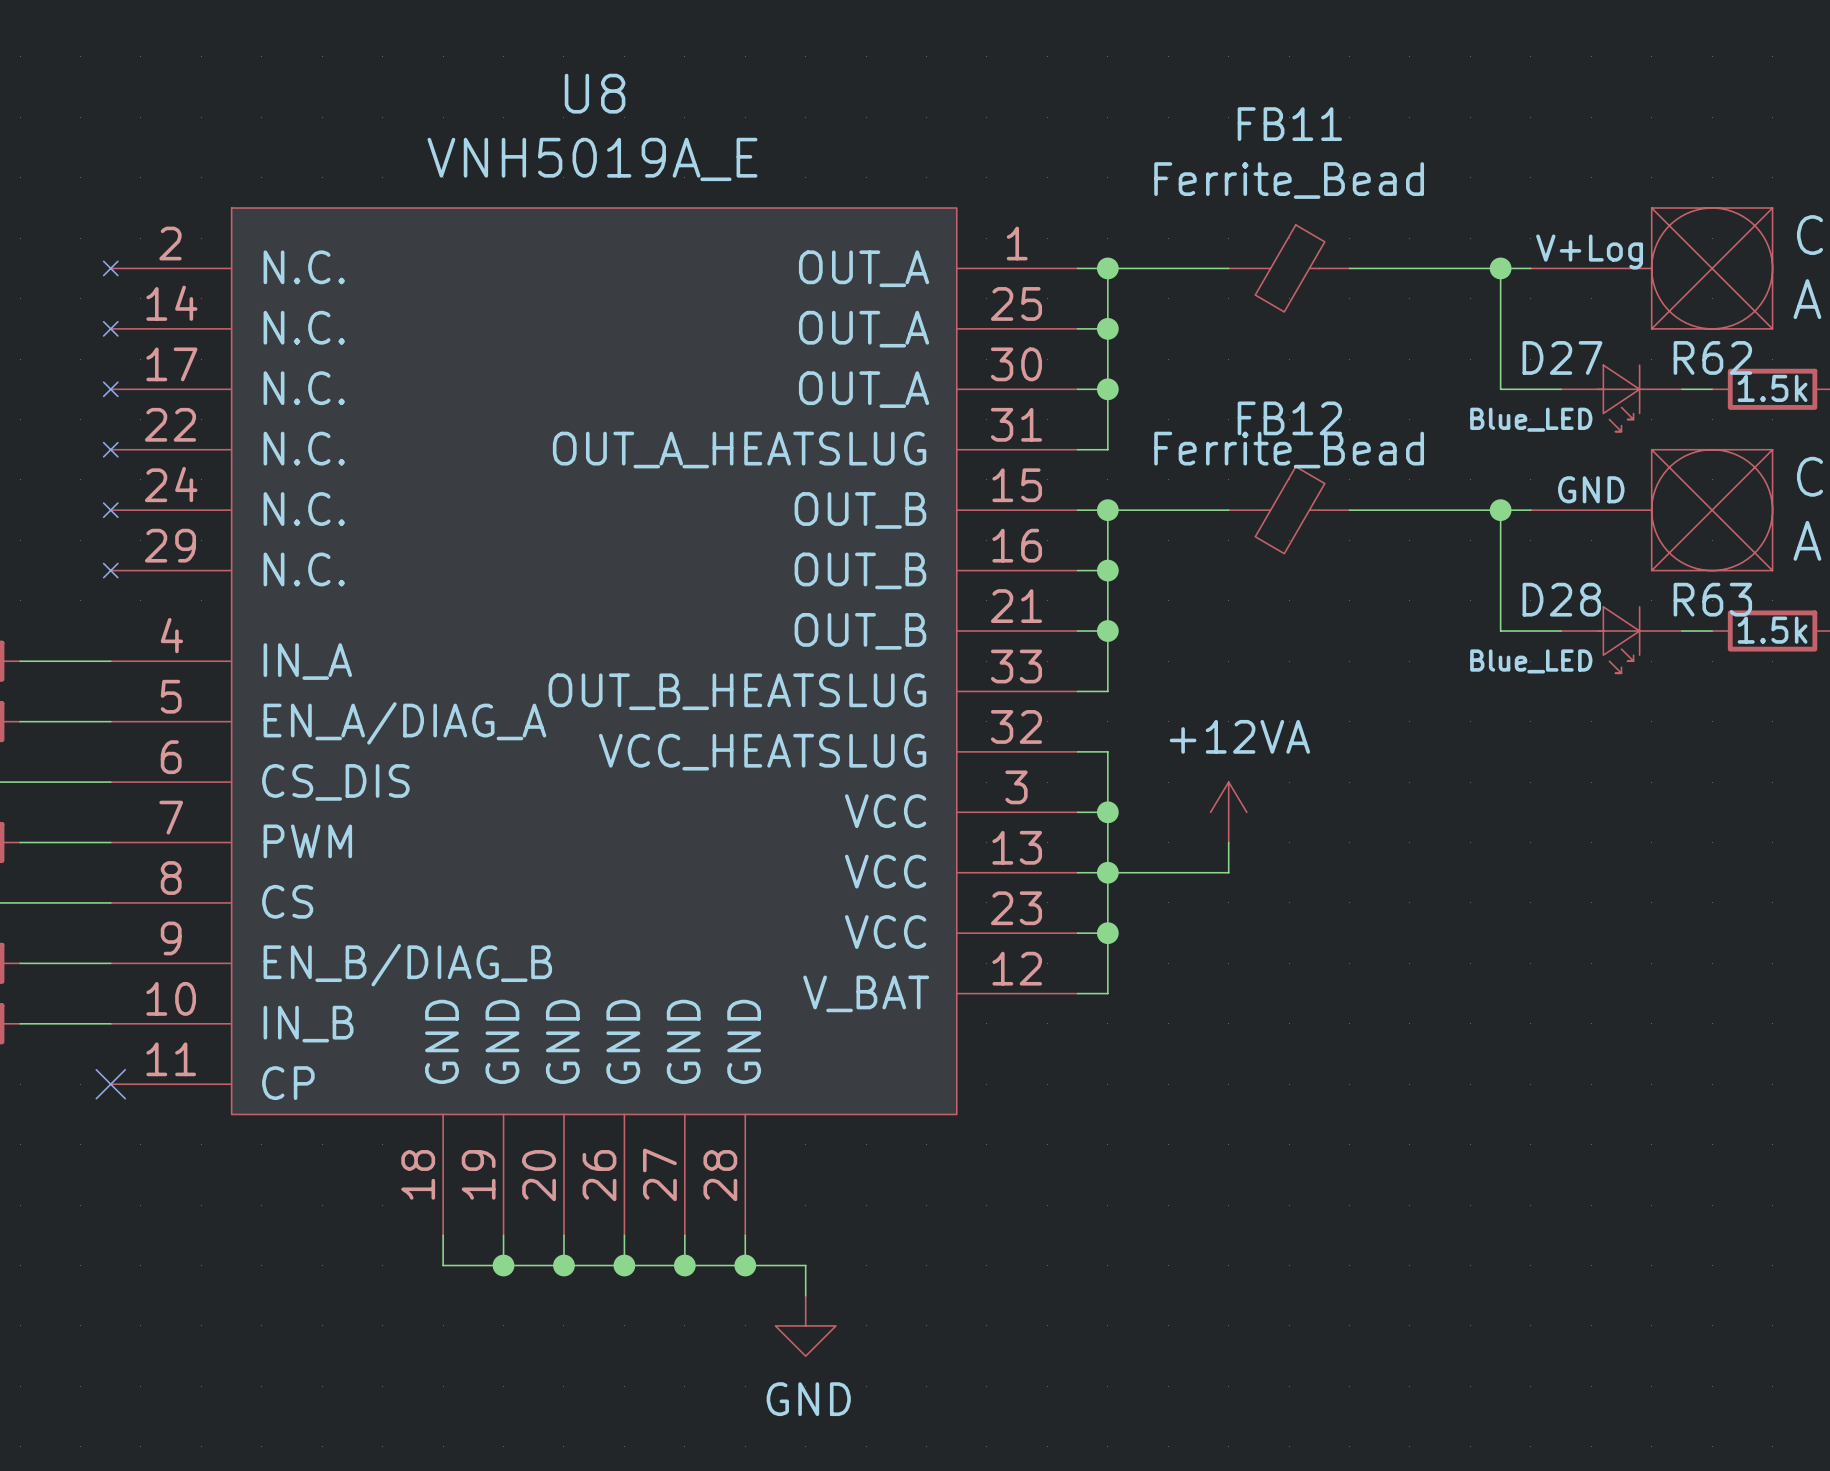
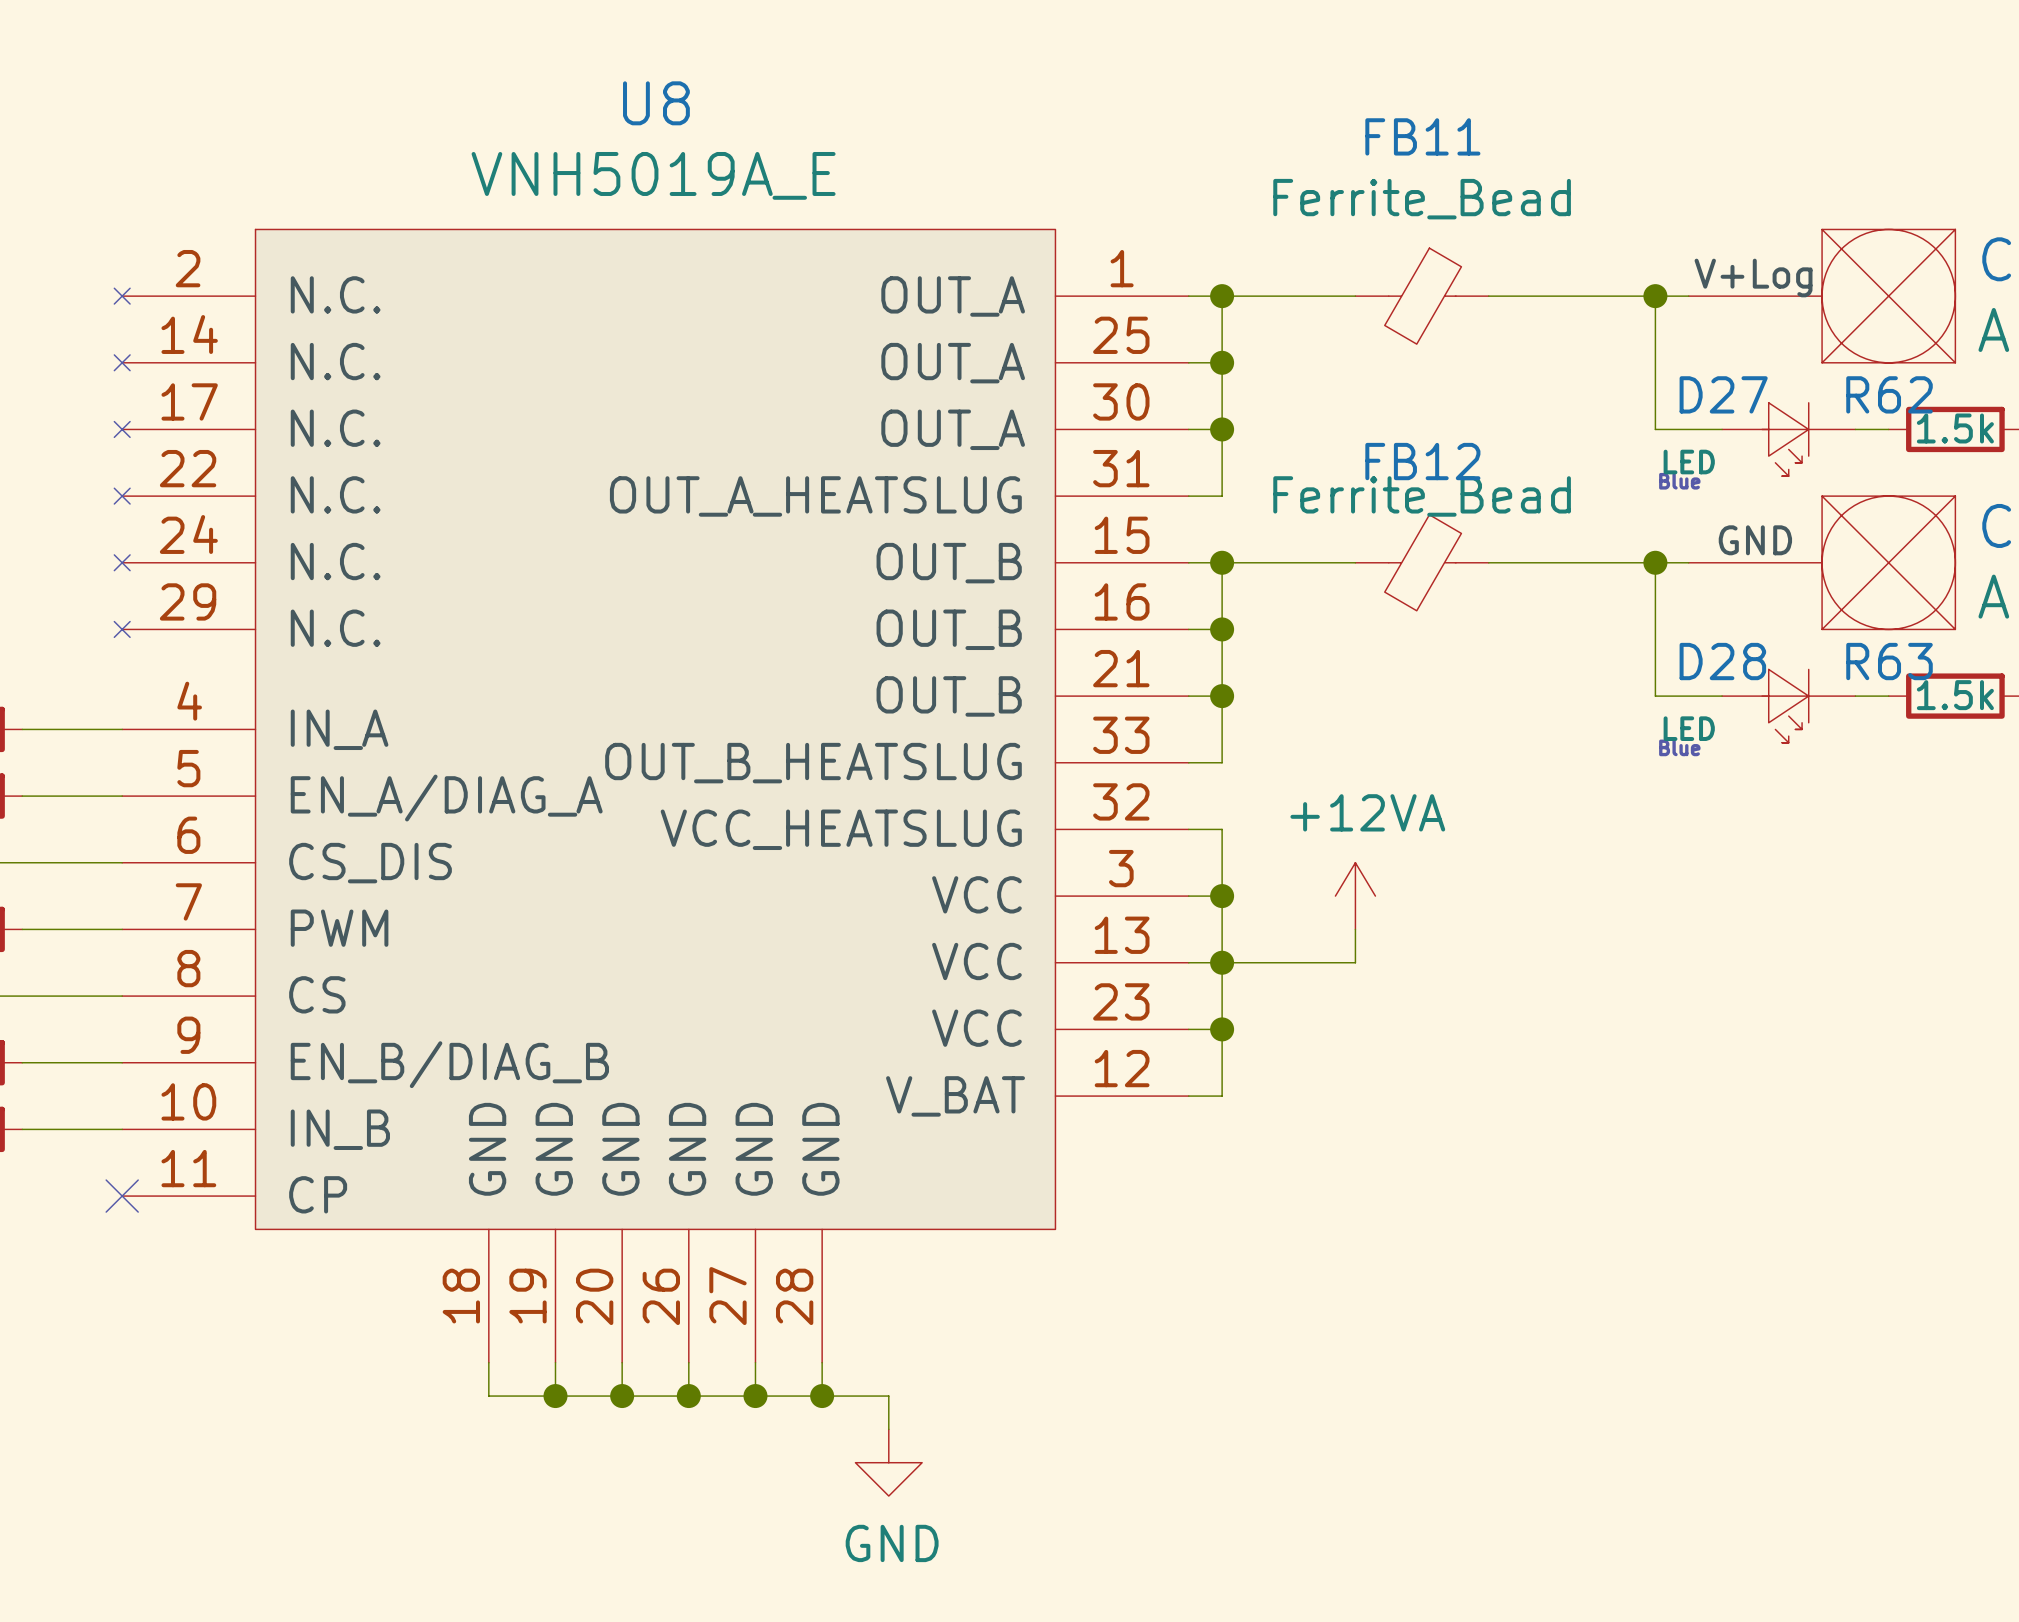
D27 value: Blue_LED (1531, 419) -> LED (1689, 462)
text: none -> Blue (1679, 481)
D28 value: Blue_LED (1531, 661) -> LED (1689, 728)
text: none -> Blue (1679, 747)

